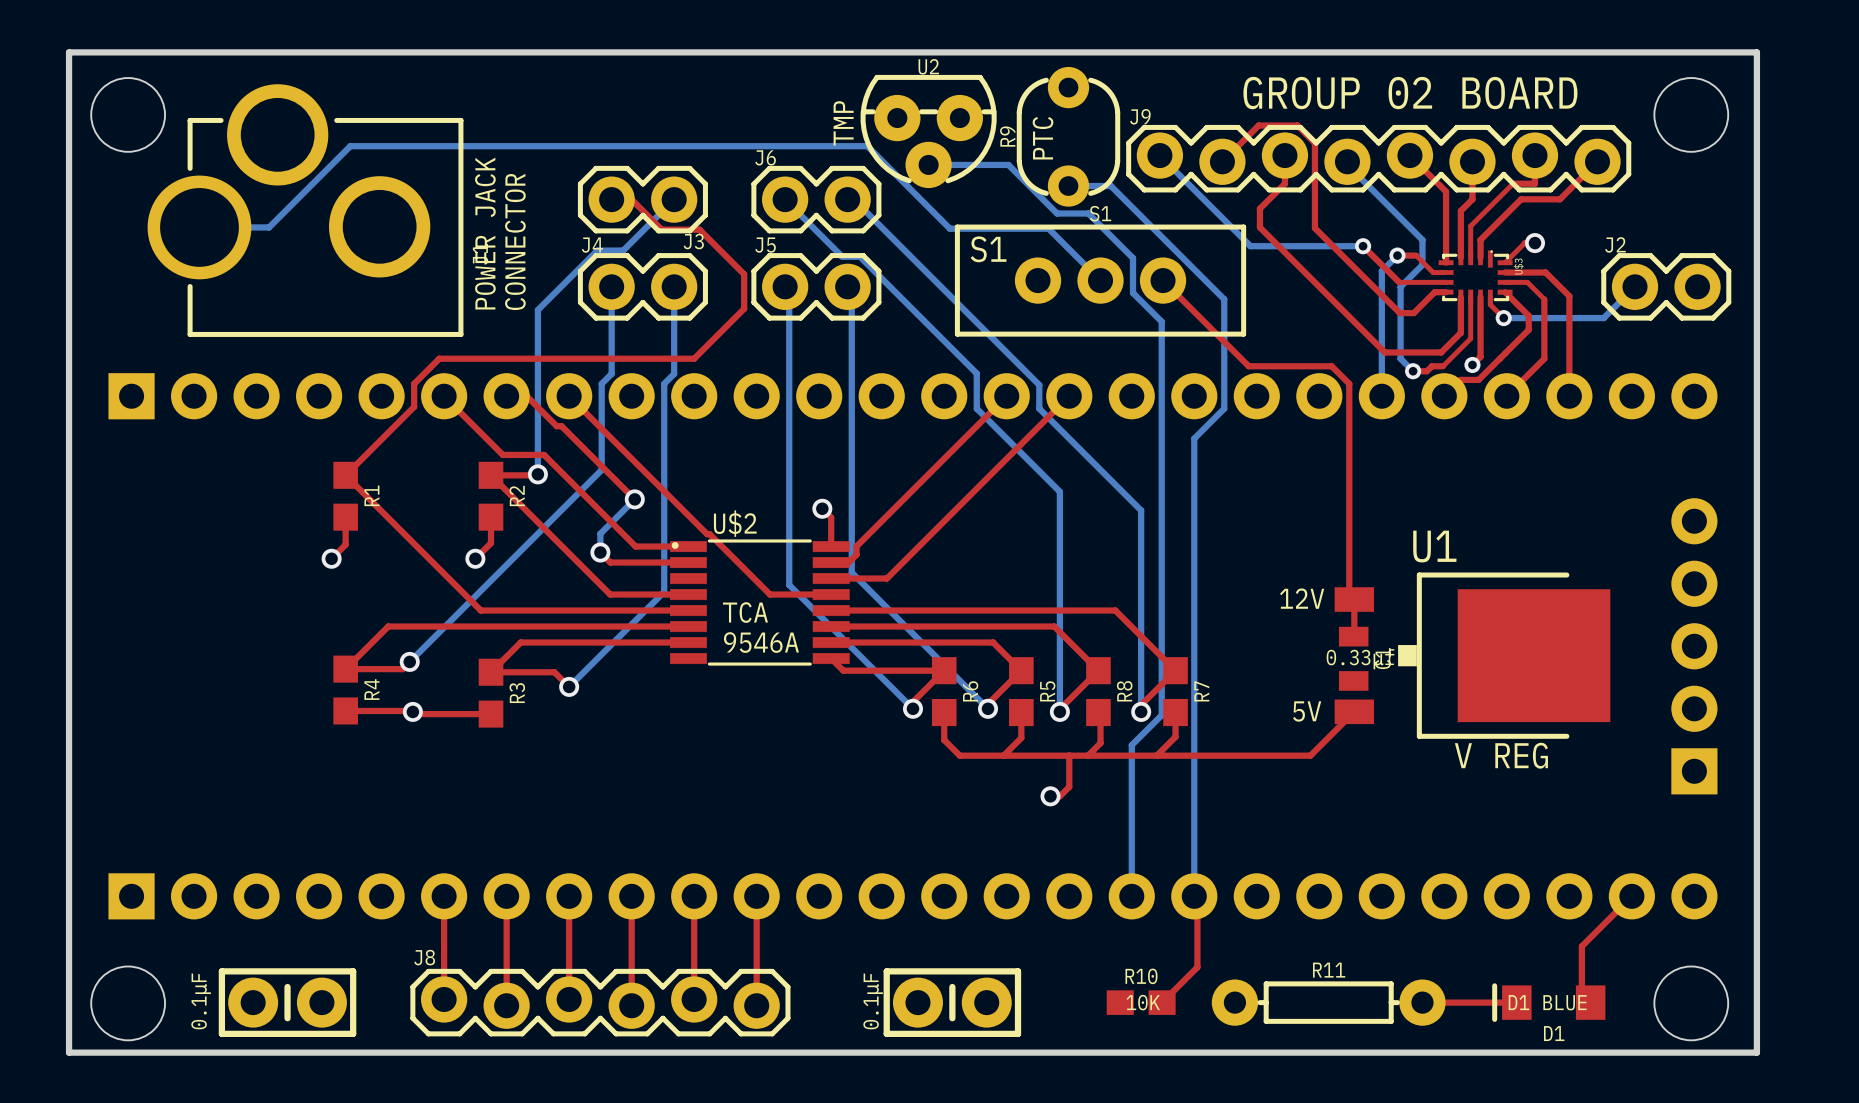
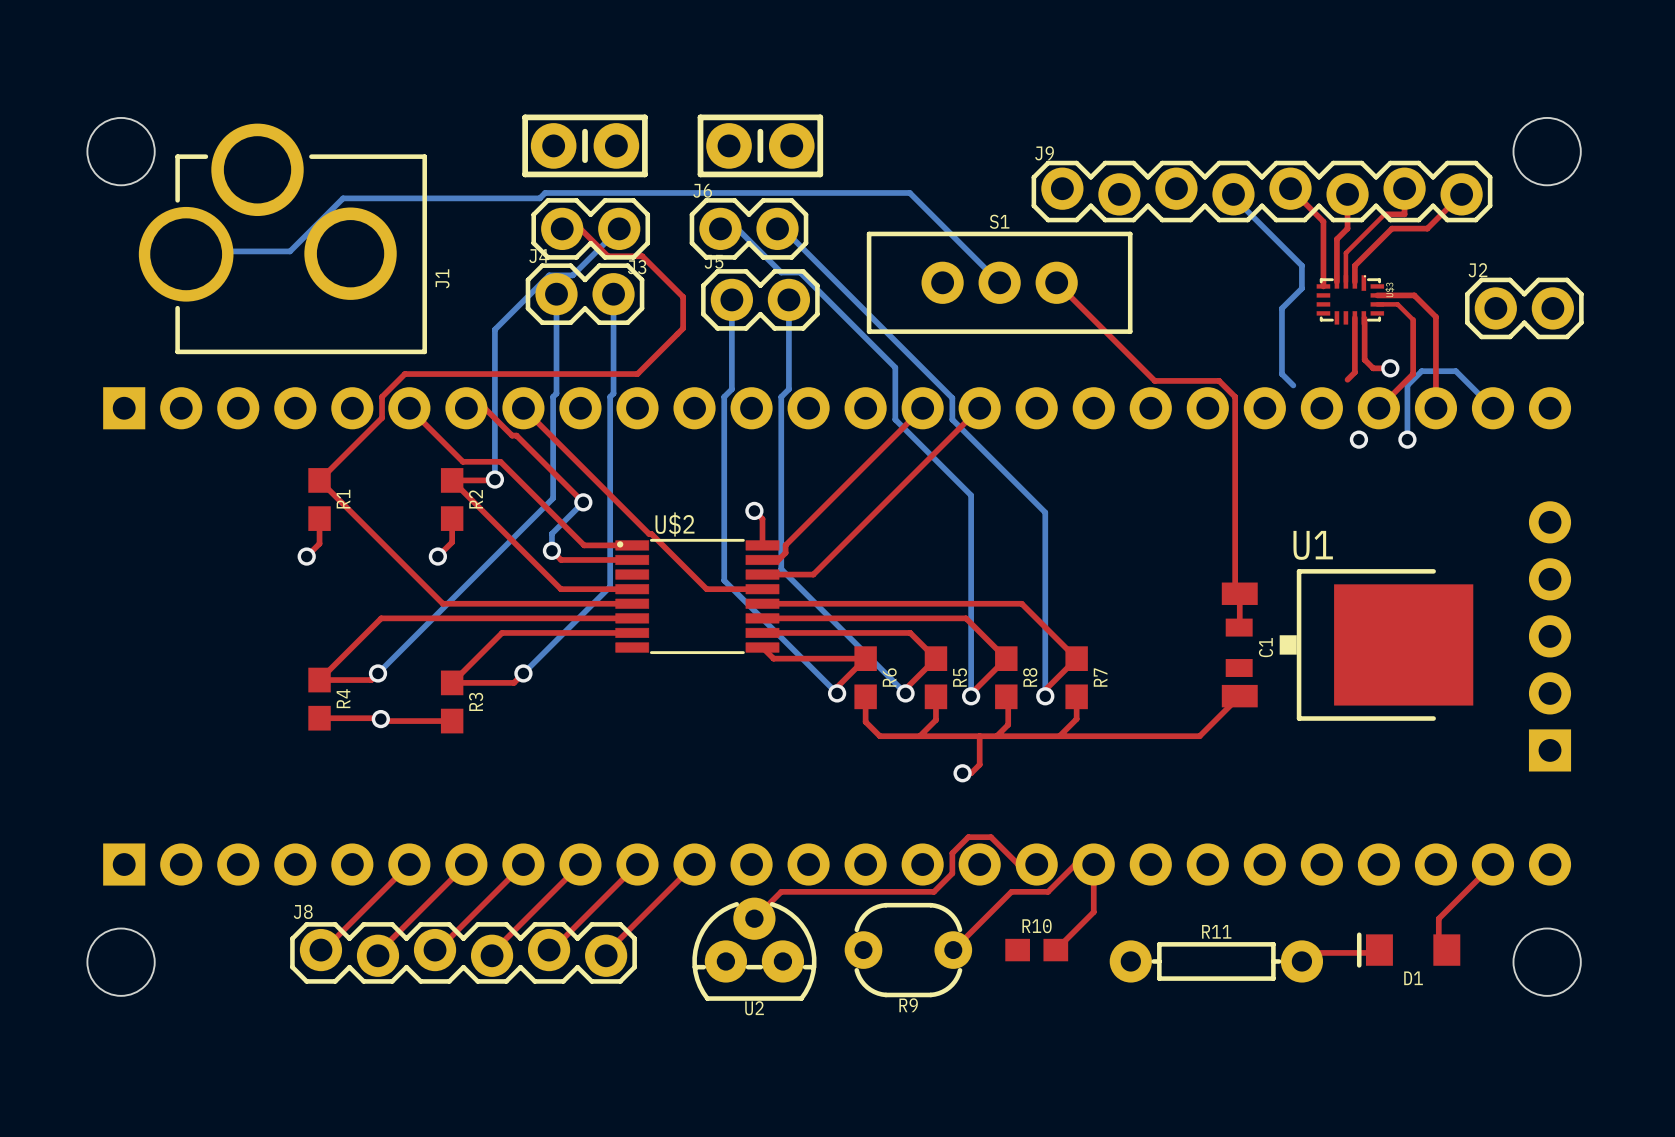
board edge: (69, 52) (69, 1052) (1756, 1052) (1756, 52) (69, 52) -> none
text: GROUP 02 BOARD (1410, 93) -> none
part: none -> (585, 145)
part: none -> (760, 145)
text: TMP (843, 123) -> none
U2 rotation: 0° (928, 131) -> 180° (754, 949)
U2 position: (928, 131) -> (754, 949)
R9 name position: R9 (1007, 136) -> R9 (908, 1005)
R9 rotation: 0° (1068, 136) -> 90° clockwise (908, 950)
R9 position: (1068, 136) -> (908, 950)
text: PTC (1043, 138) -> none
bottom track: (1159, 155) (1250, 246) (1363, 246) -> none
top track: (1284, 155) (1284, 183) (1259, 208) (1259, 227) (1384, 352) (1441, 352) (1460, 332) (1460, 297) -> none
top track: (1222, 161) (1258, 125) (1297, 125) (1314, 143) (1314, 228) (1399, 313) (1413, 313) (1434, 292) (1446, 292) -> none
bottom track: (928, 164) (1008, 164) (1057, 213) (1088, 213) (1133, 258) (1133, 293) (1161, 321) (1161, 715) (1131, 745) (1131, 896) -> none
bottom track: (1068, 186) (1110, 186) (1224, 299) (1224, 408) (1194, 438) (1194, 896) -> none
bottom track: (785, 199) (842, 256) (860, 256) (976, 373) -> (731, 223) (781, 272) (800, 272) (895, 367) (895, 387)
bottom track: none -> (200, 251) (290, 251) (343, 198) (539, 198) (545, 192) (909, 192) (999, 282)
bottom track: (199, 227) (269, 227) (350, 146) (867, 146) (949, 228) (1048, 228) (1100, 280) -> none
text: POWER JACK (485, 233) -> none
text: CONNECTOR (515, 241) -> none
top track: (1534, 243) (1524, 243) (1505, 262) -> none
via: (1534, 243) -> none
top track: (1363, 246) (1399, 282) (1446, 282) -> none
via: (1363, 246) -> none
text: S1 (988, 249) -> none
bottom track: (1397, 255) (1381, 271) (1381, 396) -> none
top track: (1397, 255) (1416, 255) (1433, 272) (1446, 272) -> none
via: (1397, 255) -> none
S1 position: (1100, 280) -> (999, 282)
top track: (1163, 280) (1248, 366) (1261, 366) -> (1056, 282) (1154, 380)
bottom track: (611, 286) (611, 373) (605, 380) -> (556, 294) (556, 393)
J4 position: (642, 286) -> (585, 294)
bottom track: (674, 286) (674, 373) (667, 380) -> (613, 294) (613, 393)
bottom track: (785, 286) (789, 290) (789, 383) -> (731, 299) (731, 389) (724, 396)
J5 position: (816, 286) -> (760, 299)
bottom track: (847, 286) (851, 290) (851, 383) -> (788, 299) (788, 389) (781, 396)
bottom track: (1635, 286) (1603, 318) (1503, 318) -> none
top track: (1505, 292) (1528, 315) (1528, 329) (1478, 379) (1460, 379) (1444, 396) -> none
top track: (1470, 297) (1470, 338) (1443, 366) (1431, 366) (1426, 371) (1413, 371) -> none
top track: (1490, 297) (1490, 304) (1503, 318) -> (1363, 317) (1364, 359) (1373, 368) (1390, 368)
via: (1503, 318) -> none
via: none -> (1390, 368)
via: (1472, 364) -> none
via: (1413, 371) -> none
bottom track: none -> (1492, 408) (1455, 371) (1421, 371) (1407, 385) (1407, 439)
via: none -> (1358, 439)
via: none -> (1407, 439)
bottom track: (601, 469) (409, 661) -> (553, 475) (553, 498) (378, 673)
text: 12V (1302, 598) -> none
text: TCA (745, 612) -> none
top track: (413, 626) (388, 626) (345, 669) (402, 669) (409, 661) -> (381, 618) (319, 680) (371, 680) (378, 673)
top track: (545, 642) (520, 642) (491, 672) (554, 672) (569, 686) -> (502, 632) (452, 682) (514, 682) (523, 673)
text: 9546A (761, 642) -> none
text: 0.33μf (1360, 659) -> none
via: (409, 661) -> none
via: none -> (378, 673)
R4 position: (345, 690) -> (319, 699)
R3 position: (491, 693) -> (452, 701)
top track: (345, 710) (411, 710) (415, 714) (491, 714) -> (319, 718) (452, 721)
via: (412, 711) -> none
text: 5V (1307, 711) -> none
via: none -> (380, 719)
text: V REG (1501, 755) -> none
top track: (444, 896) (444, 999) -> (409, 864) (323, 950) (320, 950)
top track: (506, 896) (506, 1005) -> (466, 864) (378, 952) (378, 955)
top track: (569, 896) (569, 999) -> (523, 864) (437, 950) (435, 950)
top track: (631, 896) (631, 1005) -> (580, 864) (492, 952) (492, 955)
top track: (694, 896) (694, 999) -> (637, 864) (551, 950) (549, 950)
top track: (756, 896) (756, 1005) -> (694, 864) (606, 952) (606, 955)
top track: none -> (1036, 864) (1018, 864) (991, 837) (968, 837) (952, 853) (952, 873) (933, 891) (781, 891) (754, 918)
top track: (1194, 896) (1197, 899) (1197, 967) (1162, 1002) -> none
top track: (1581, 946) (1581, 993) (1590, 1002) -> (1447, 910) (1438, 918) (1438, 942) (1446, 950)
top track: none -> (953, 950) (1011, 891) (1048, 891) (1075, 864) (1093, 864) (1093, 912) (1055, 950)
top track: none -> (1379, 950) (1376, 952) (1293, 952)
text: 0.1μF (201, 1001) -> none
text: 0.1μF (873, 1001) -> none
part: (287, 1002) -> none
J8 position: (600, 1002) -> (463, 952)
part: (952, 1002) -> none
R10 position: (1141, 1002) -> (1036, 950)
text: 10K (1143, 1002) -> none
top track: (1422, 1002) (1516, 1002) -> none
text: D1 BLUE (1547, 1002) -> none
D1 position: (1548, 1002) -> (1408, 950)

